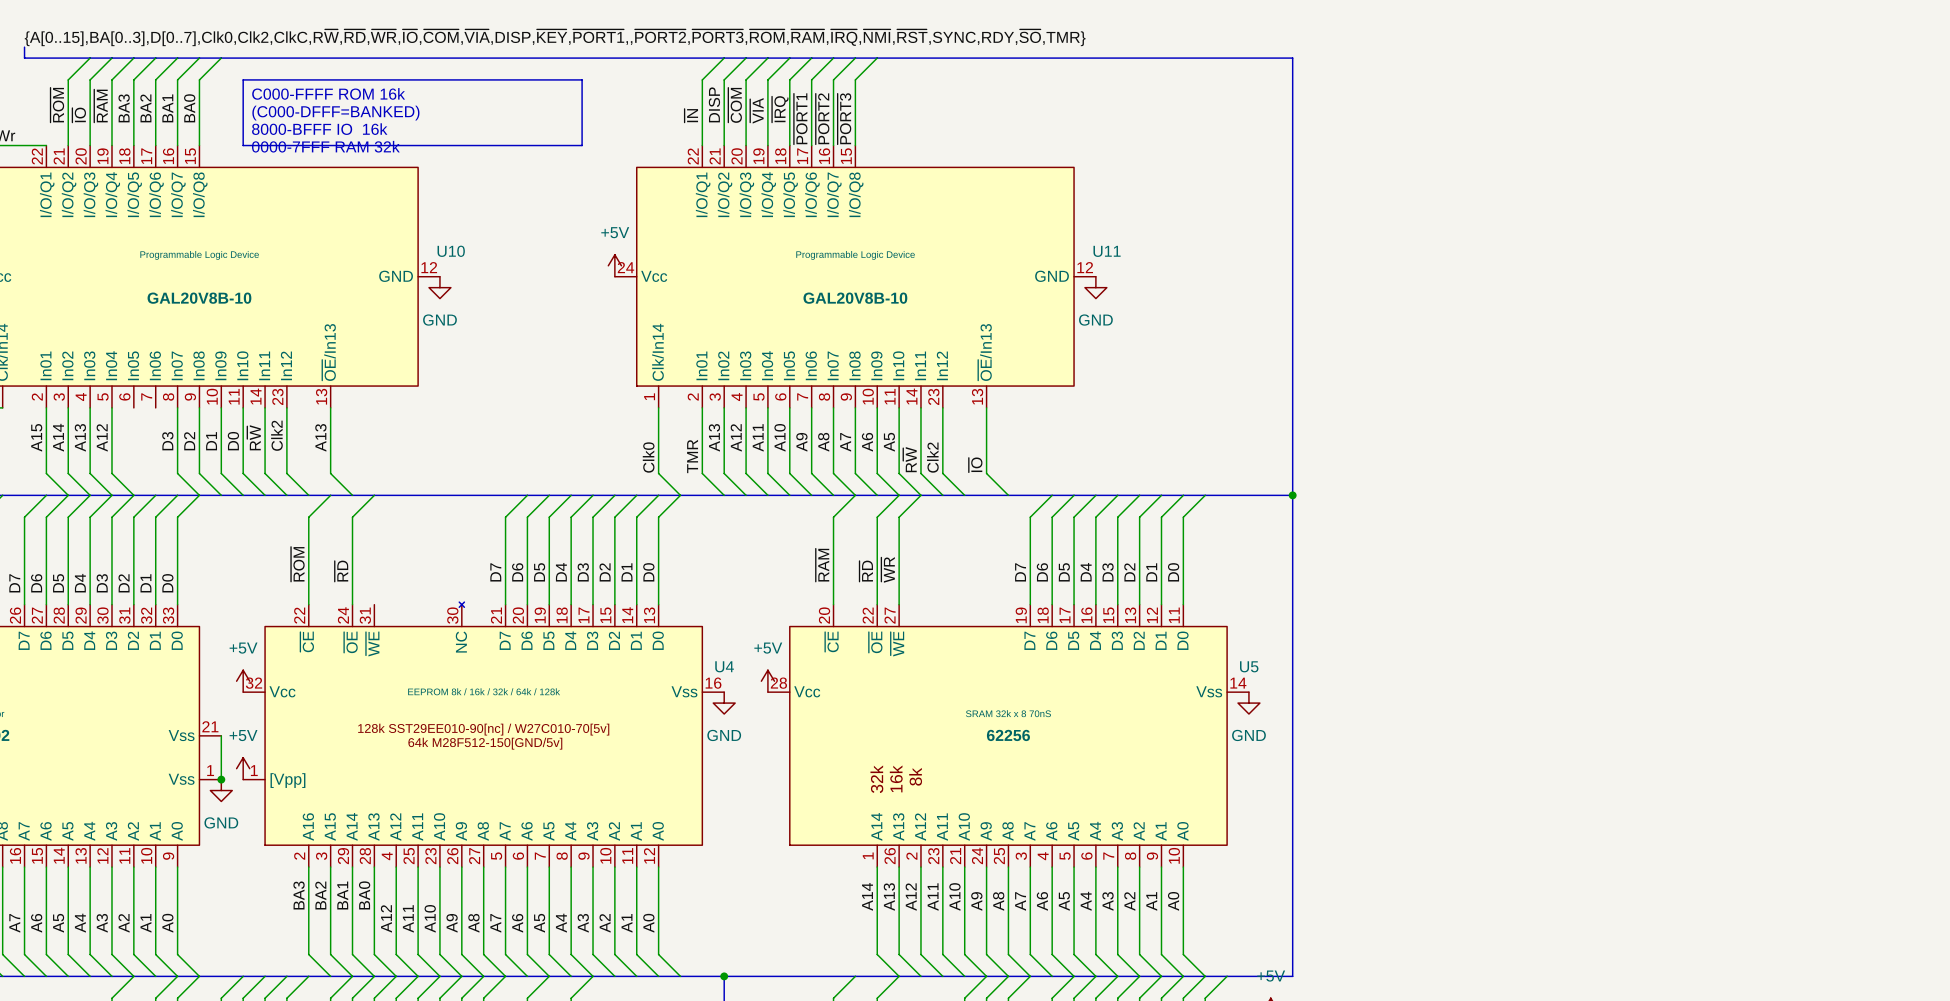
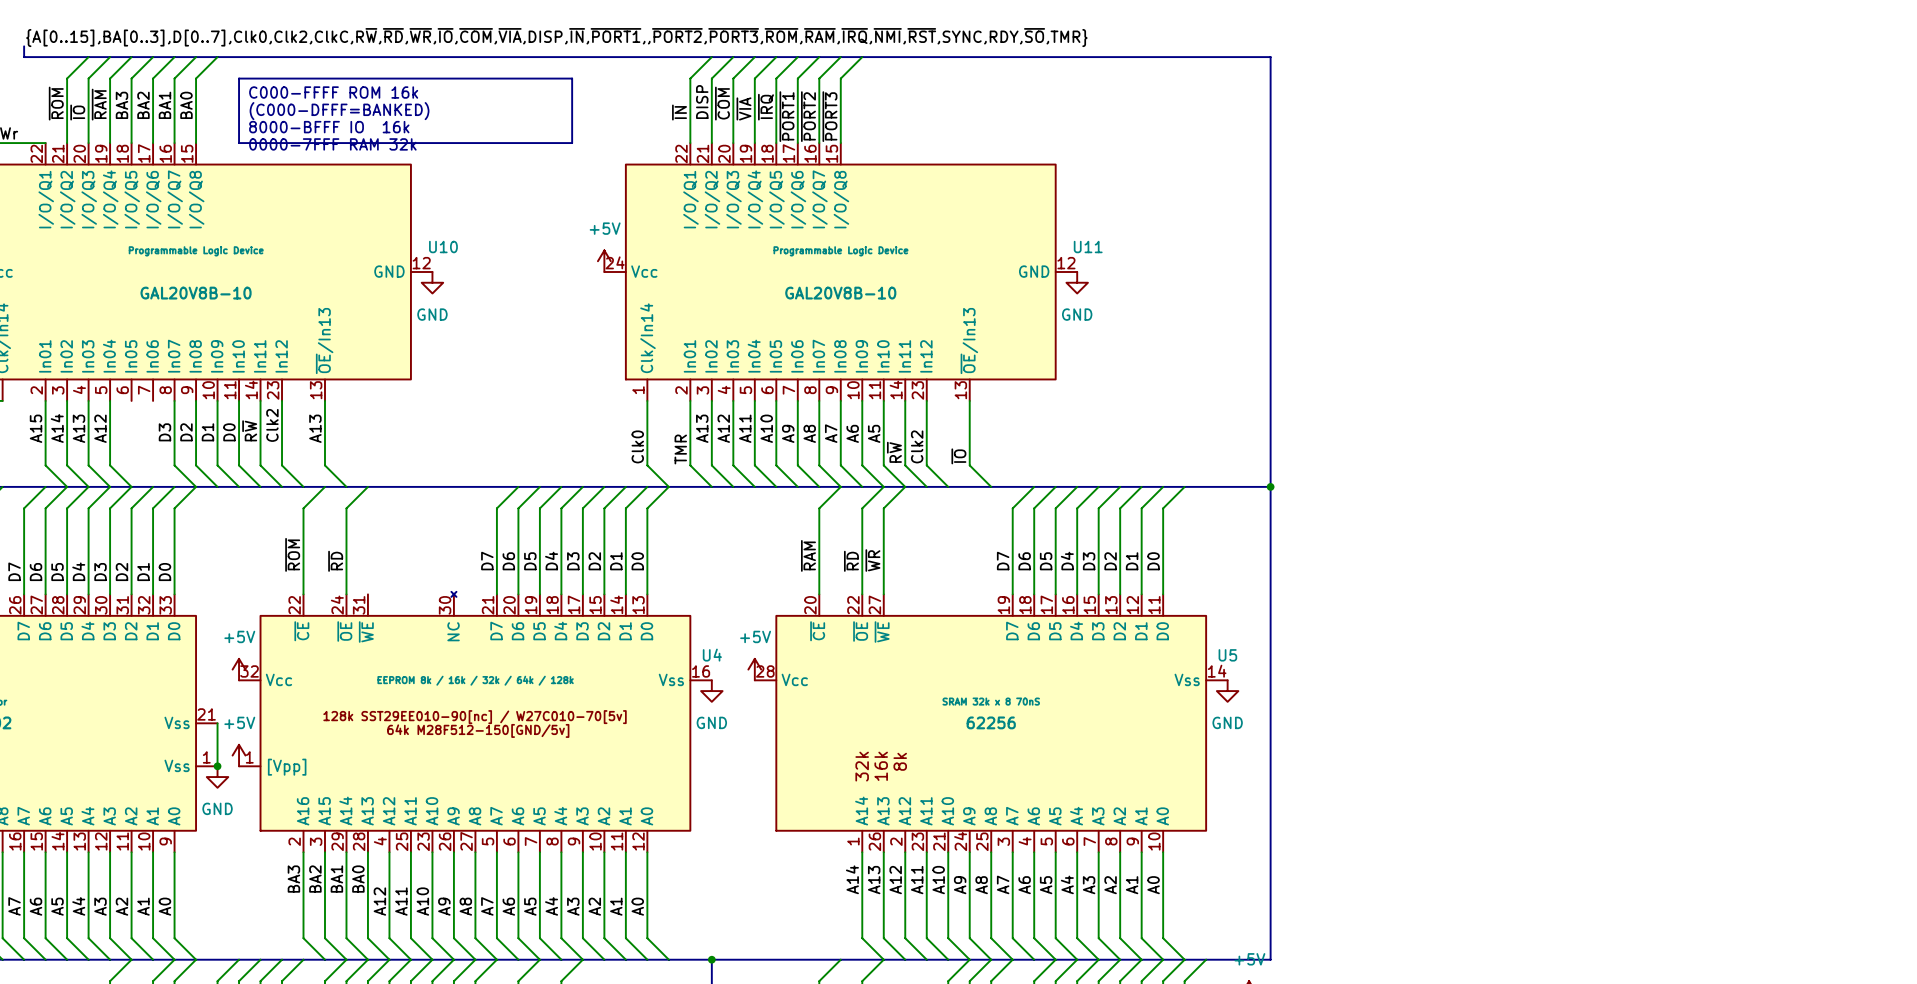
label: {A[0..15],BA[0..3],D[0..7],Clk0,Clk2,ClkC,R~{W},~{RD},~{WR},~{IO},~{COM},~{VIA},DISP,~{KEY},~{PORT1},,~{PORT2},~{PORT3},~{ROM},~{RAM},~{IRQ},~{NMI},~{RST},SYNC,RDY,~{SO},TMR} (555, 37) -> {A[0..15],BA[0..3],D[0..7],Clk0,Clk2,ClkC,R~{W},~{RD},~{WR},~{IO},~{COM},~{VIA},DISP,~{IN},~{PORT1},,~{PORT2},~{PORT3},~{ROM},~{RAM},~{IRQ},~{NMI},~{RST},SYNC,RDY,~{SO},TMR} (556, 37)

